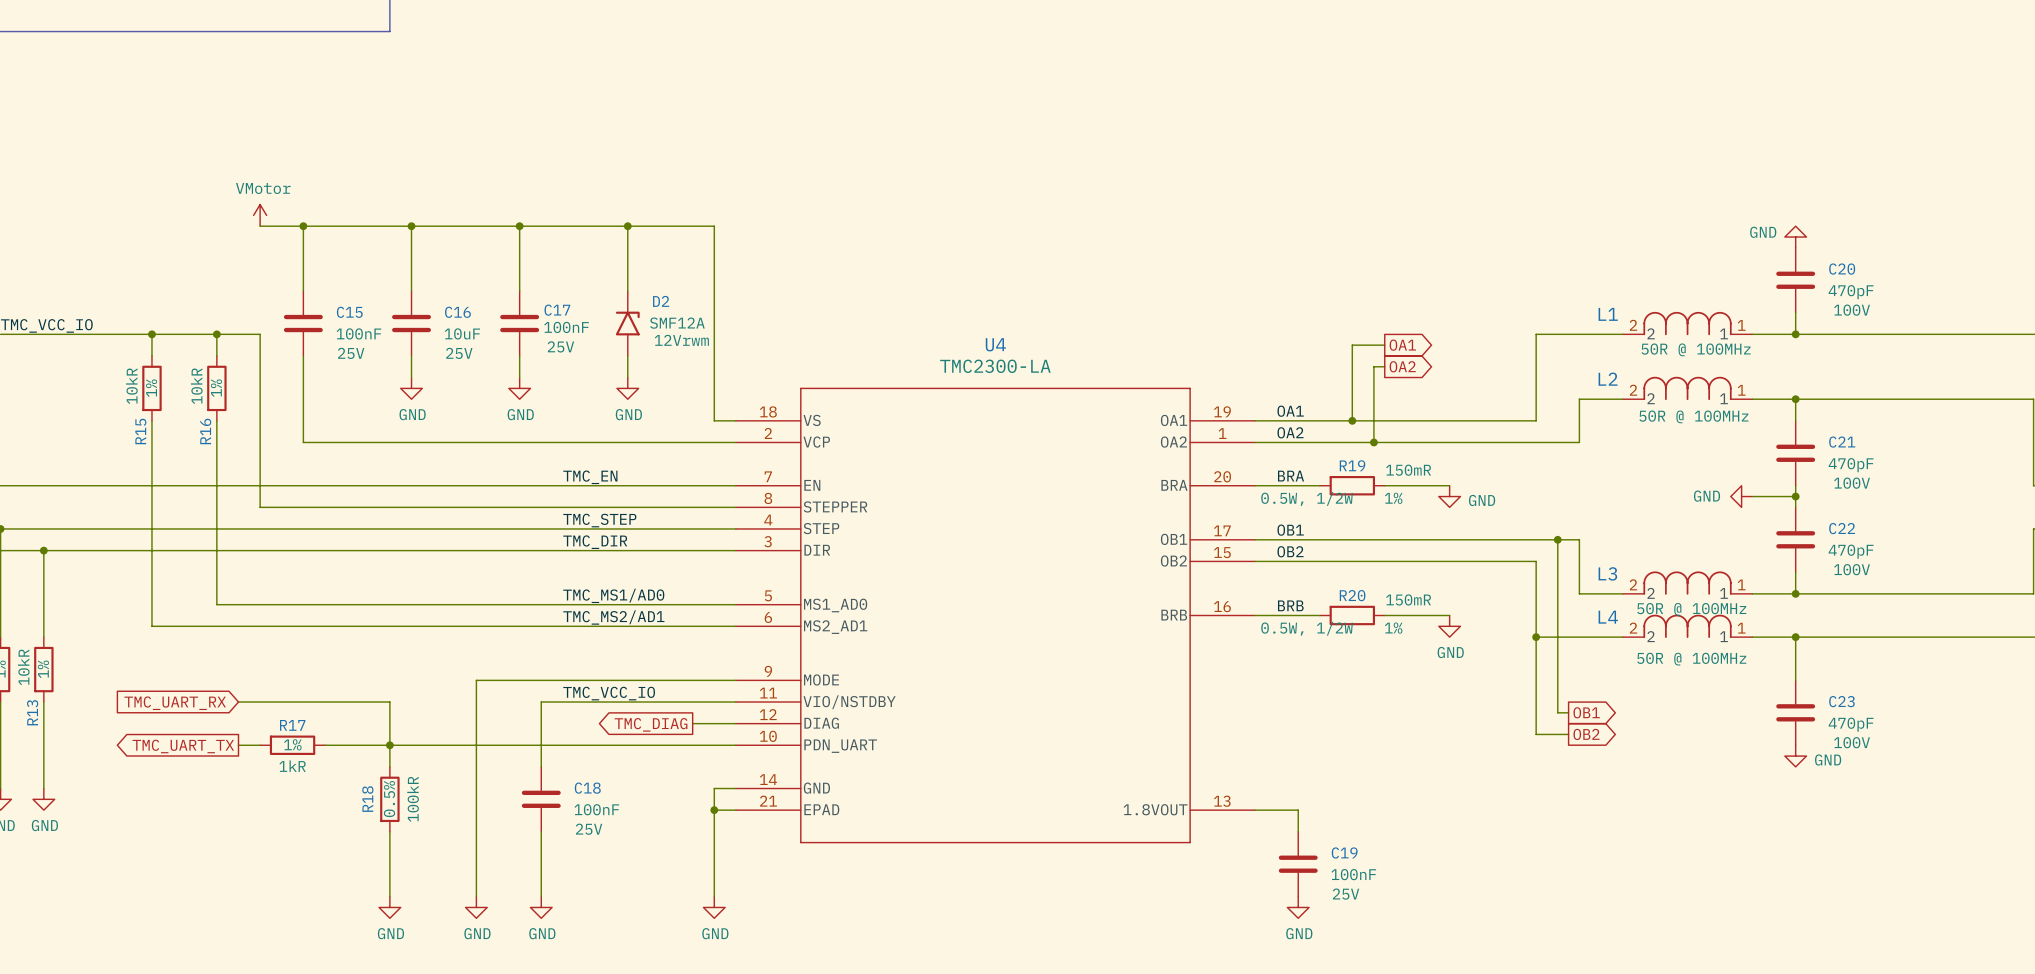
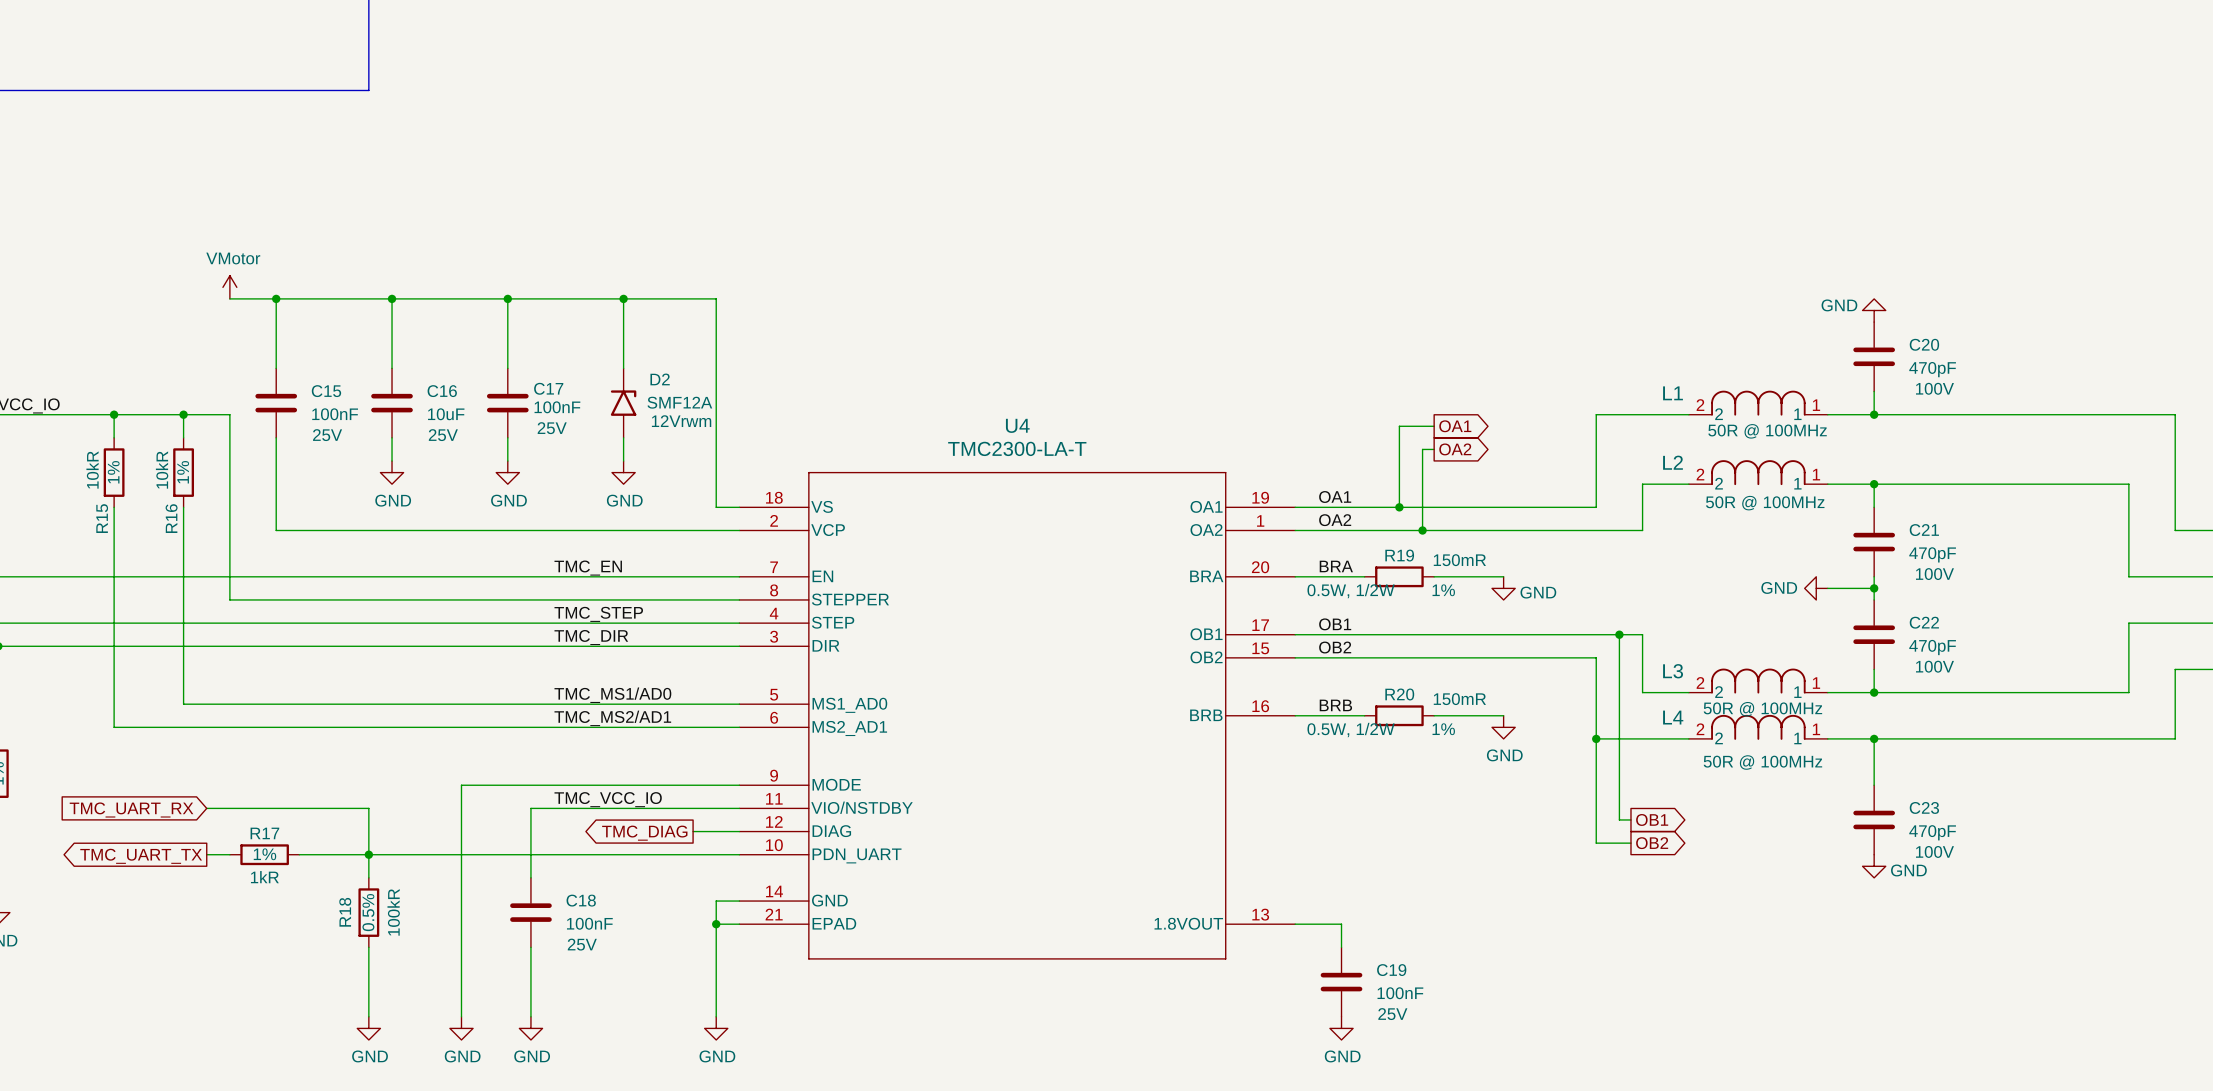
U4 value: TMC2300-LA (995, 366) -> TMC2300-LA-T (1017, 448)

